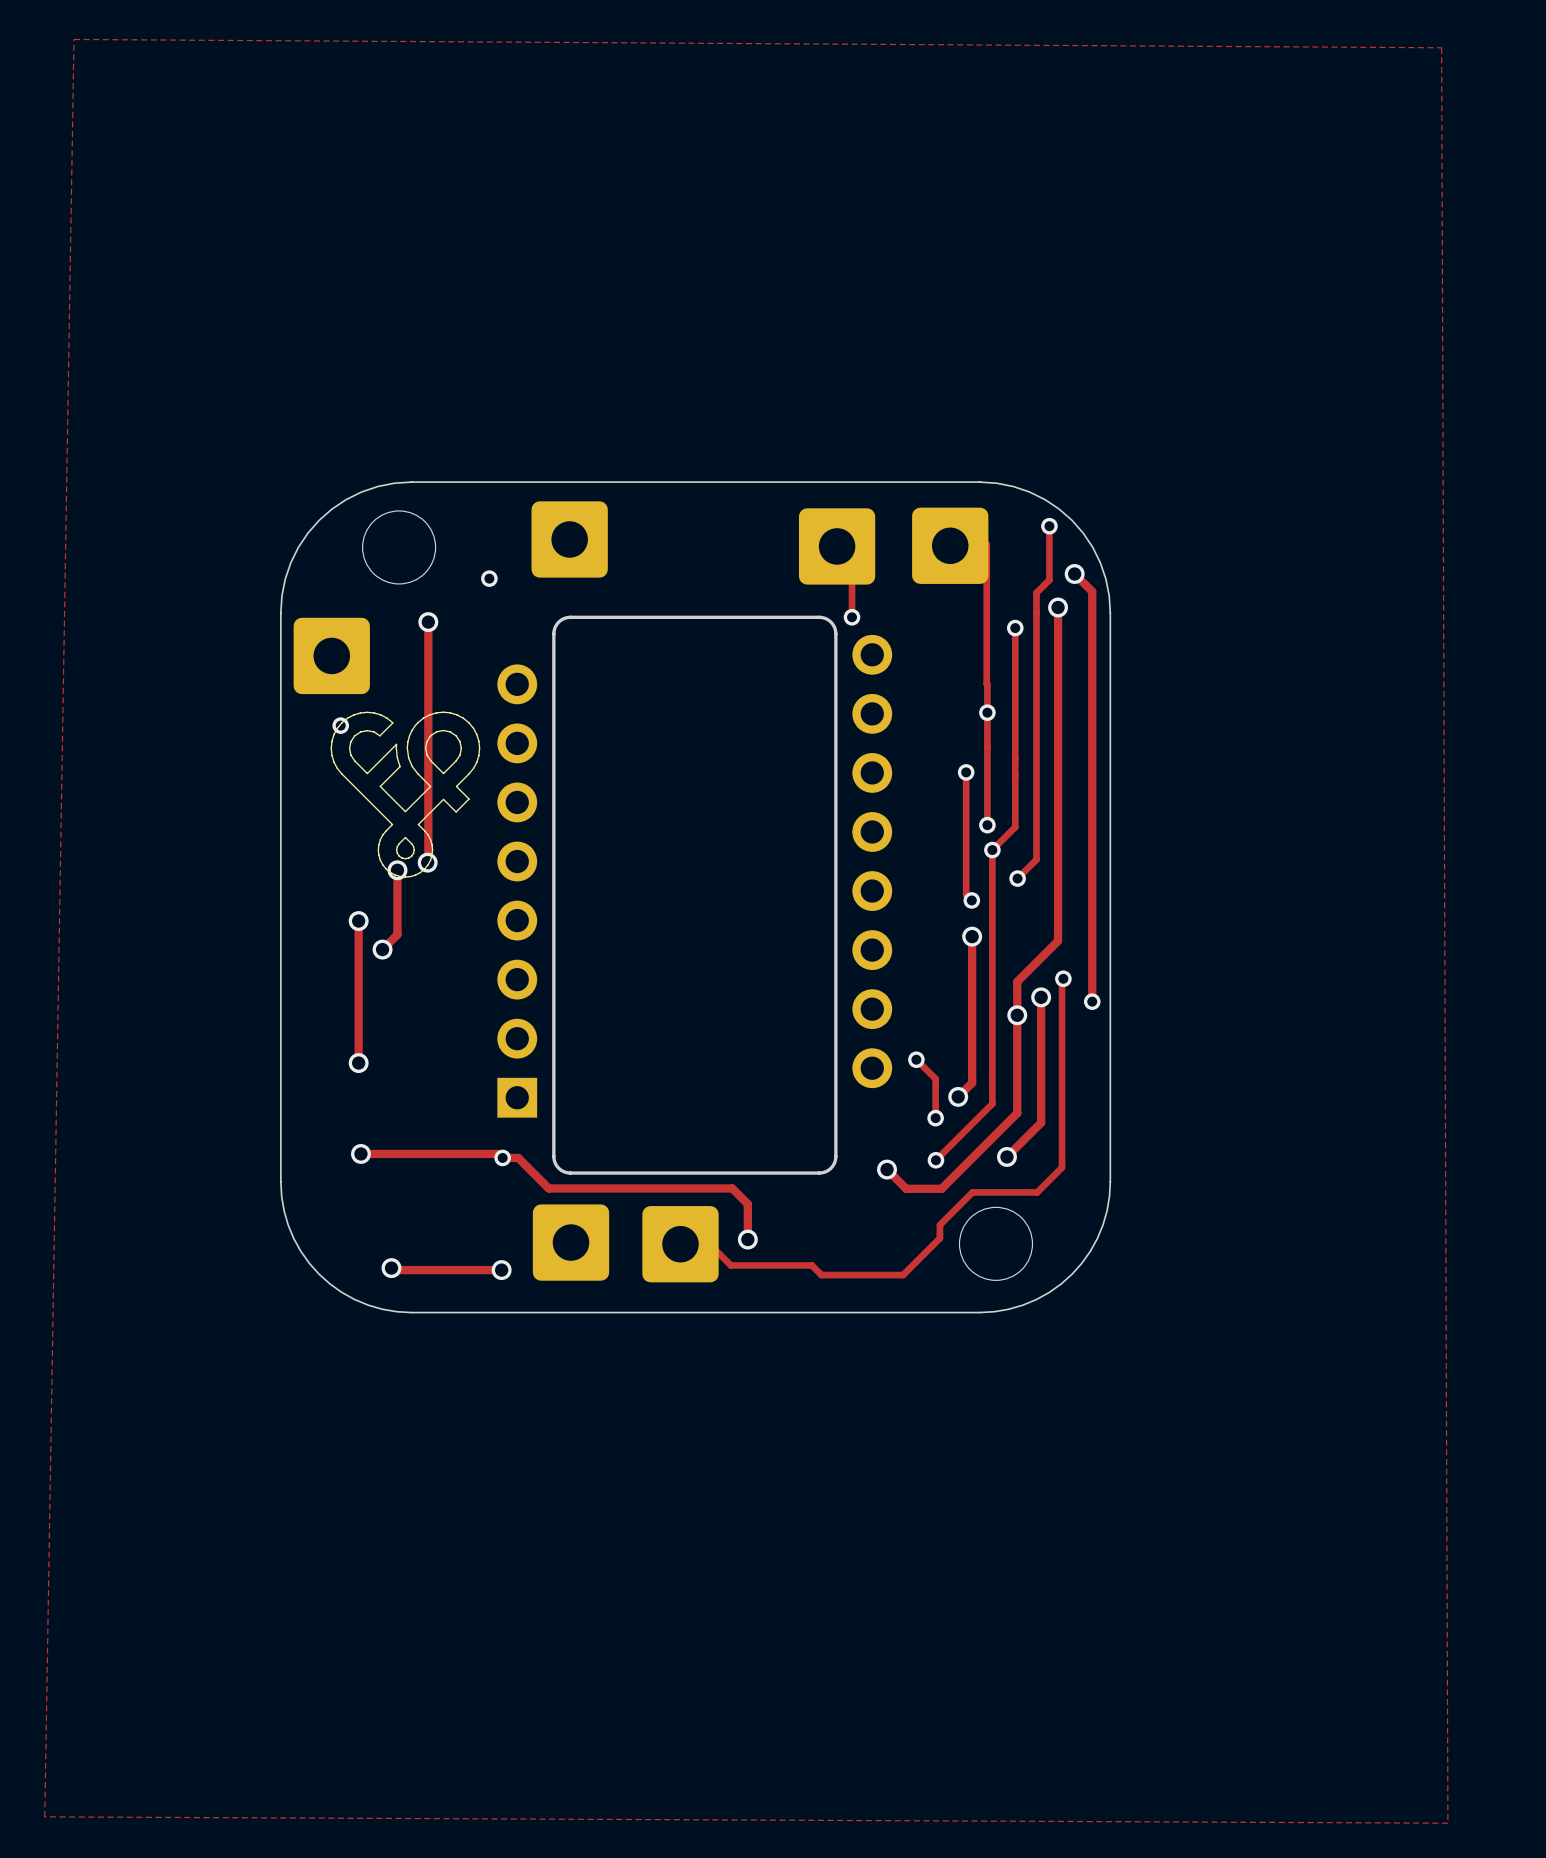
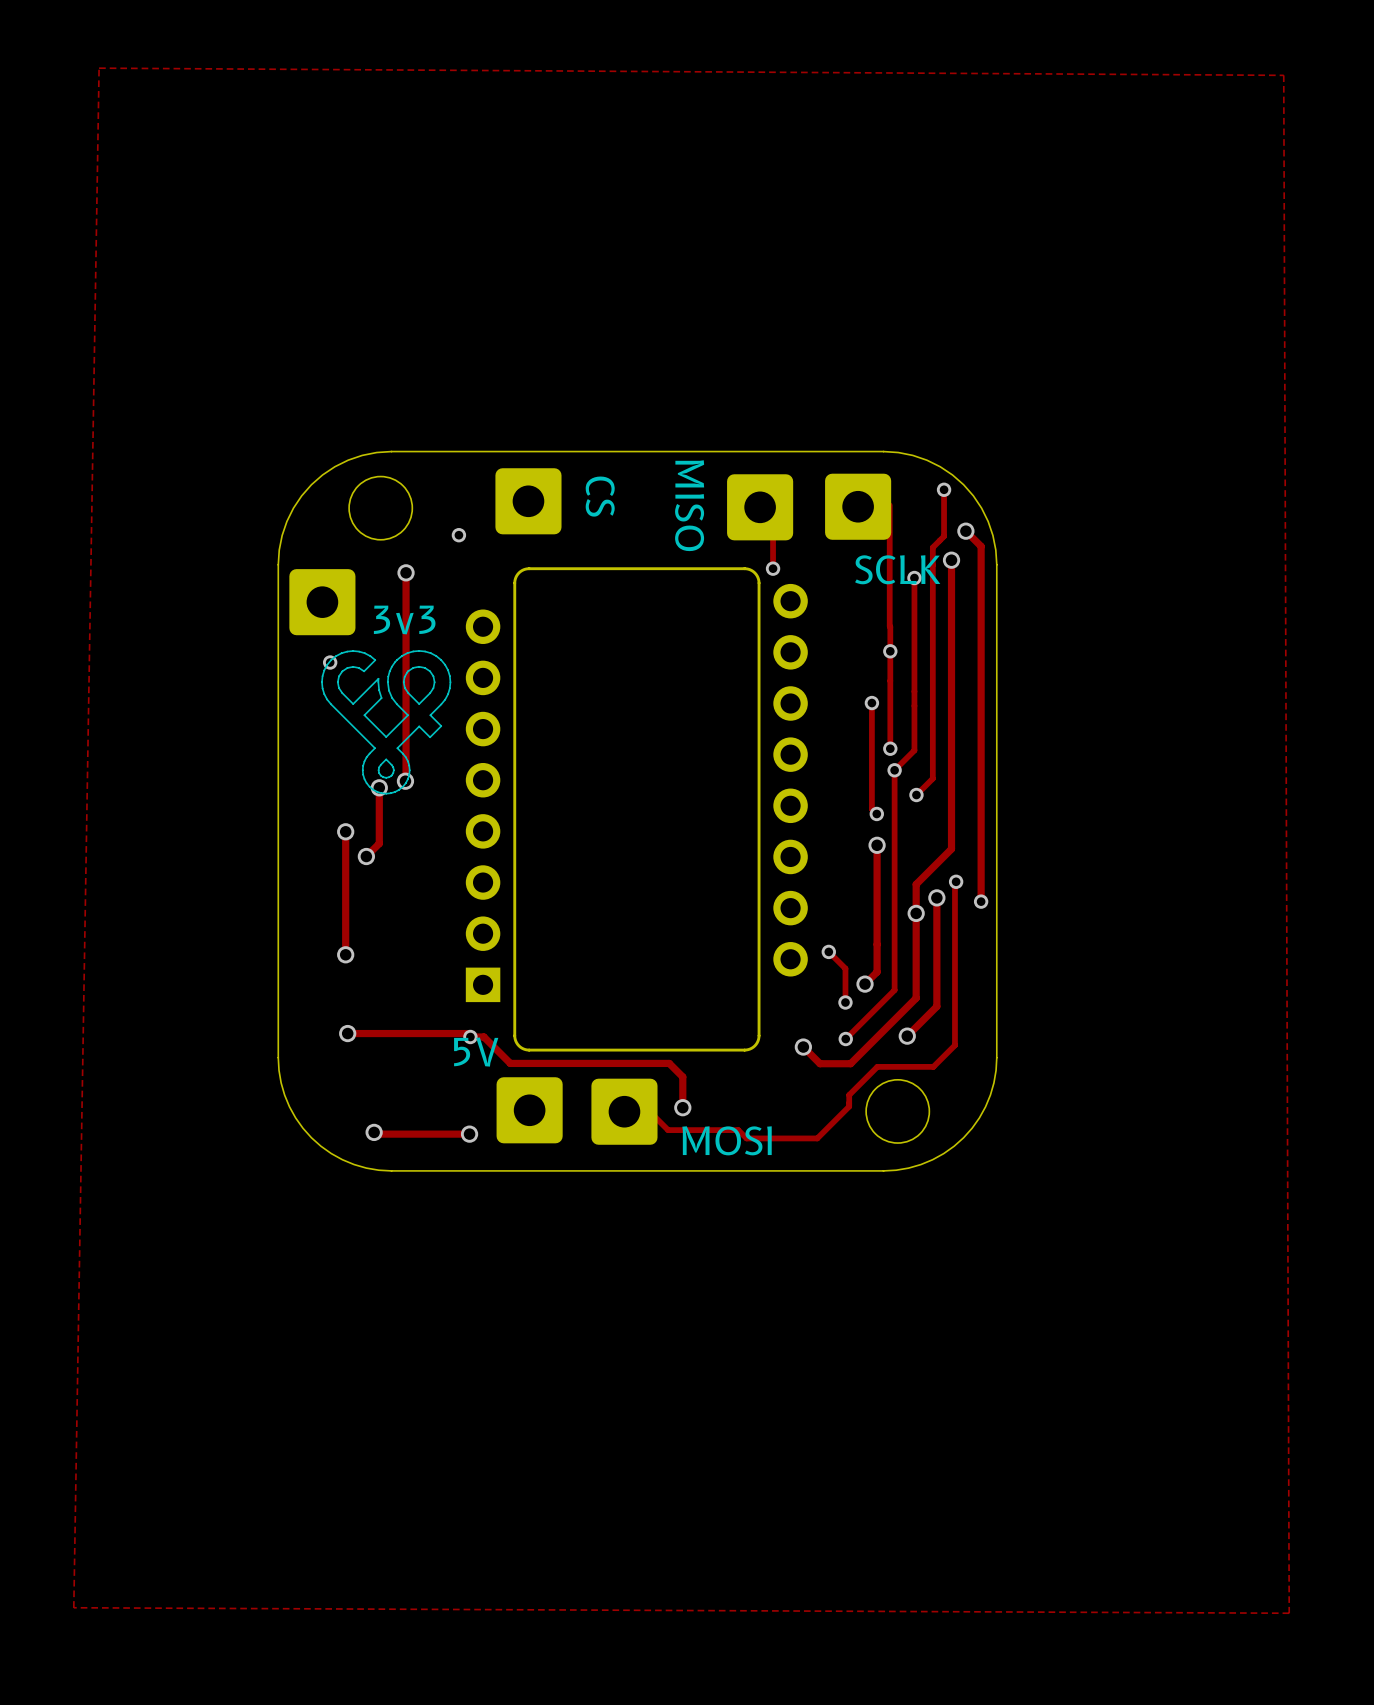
text: none -> CS (600, 496)
text: none -> MISO (689, 505)
text: none -> SCLK (897, 569)
text: none -> 3v3 (404, 620)
text: none -> 5V (476, 1052)
text: none -> MOSI (727, 1140)

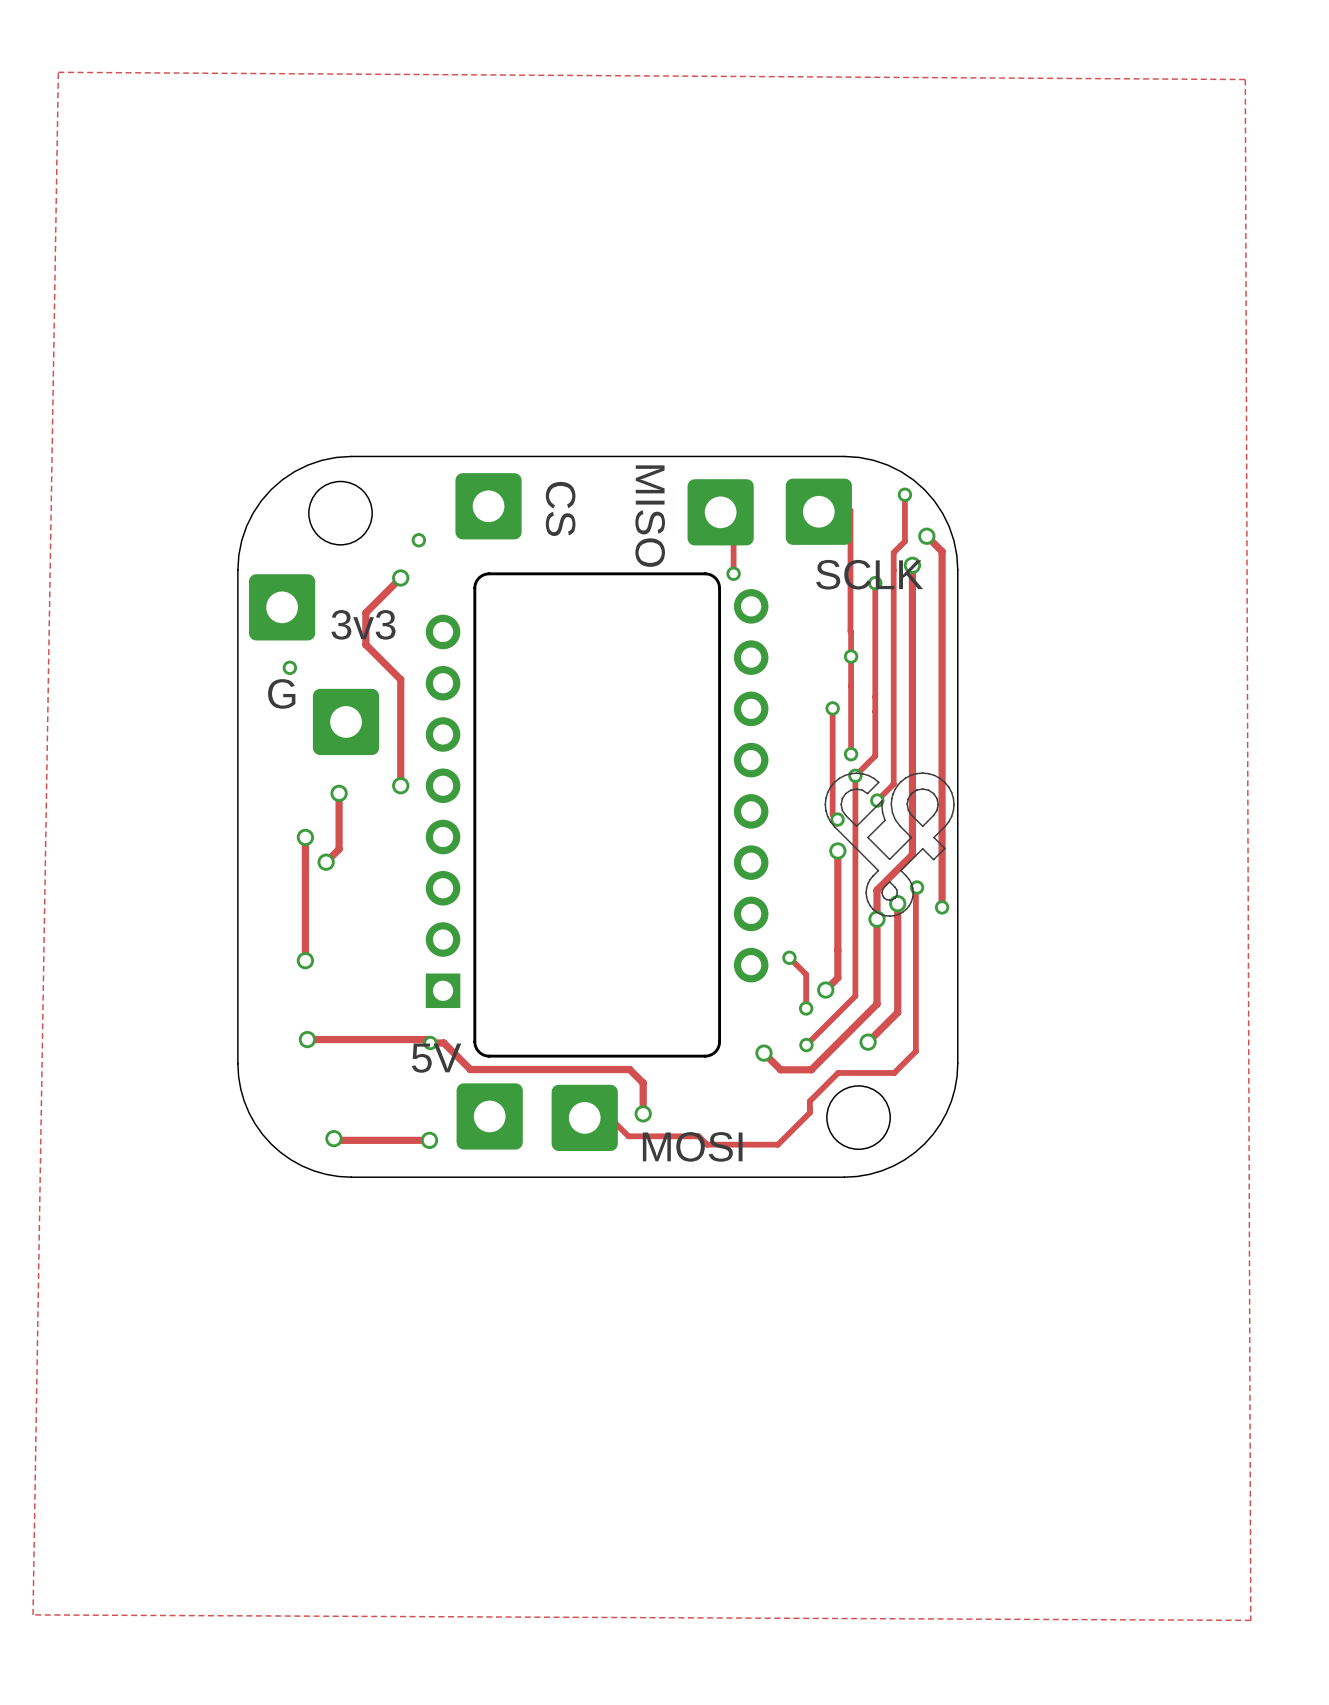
track: (406, 572) (406, 607) -> (400, 577) (365, 612)
via position: (406, 572) -> (400, 577)
track: (406, 639) (405, 781) -> (365, 644) (400, 679) (400, 785)
text: none -> G (281, 693)
part: none -> (346, 721)
drawing position: (386, 722) -> (889, 844)
via position: (405, 781) -> (400, 785)

